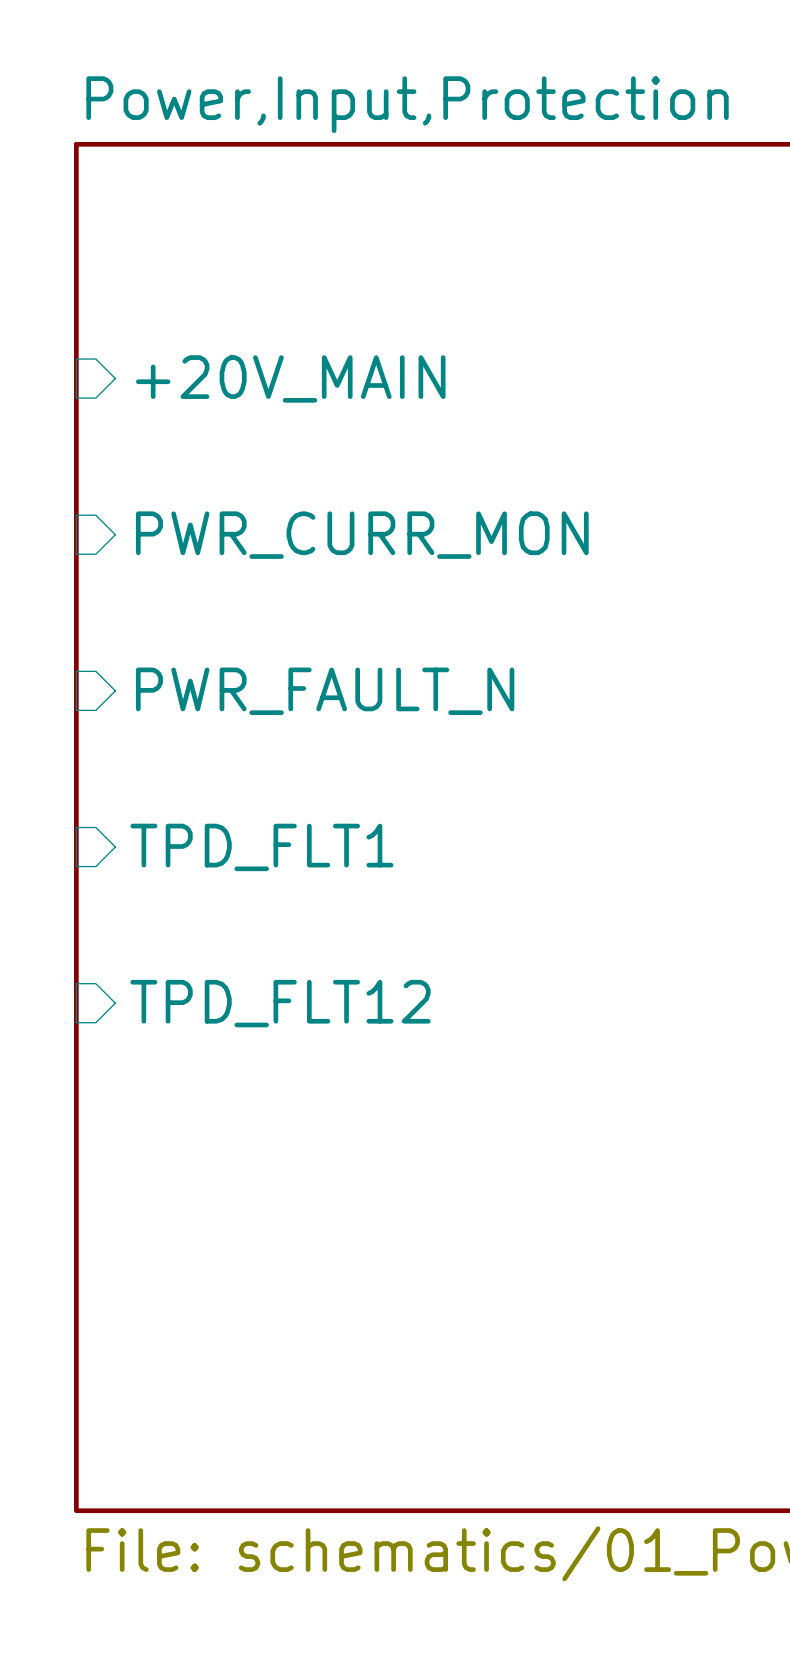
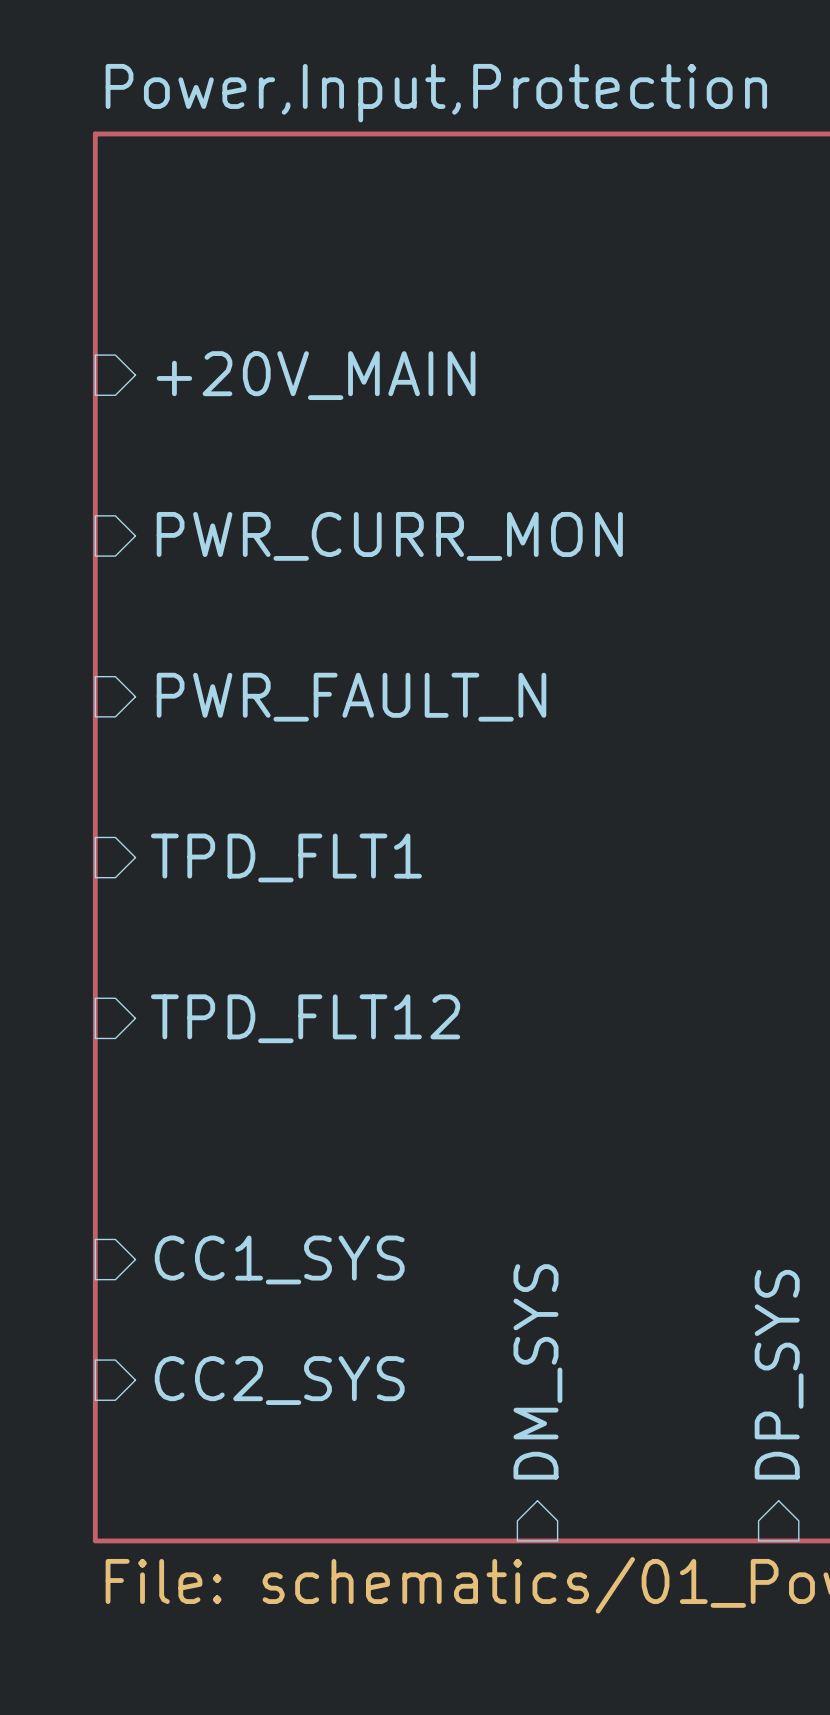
sheet pin: none -> CC1_SYS (279, 1259)
sheet pin: none -> DM_SYS (537, 1371)
sheet pin: none -> DP_SYS (779, 1374)
sheet pin: none -> CC2_SYS (279, 1380)

